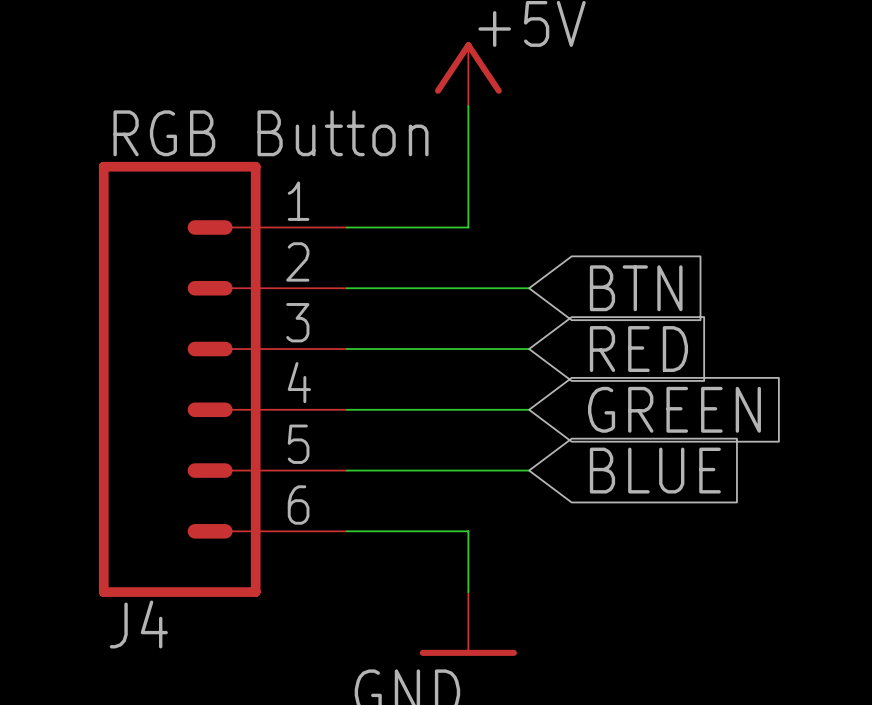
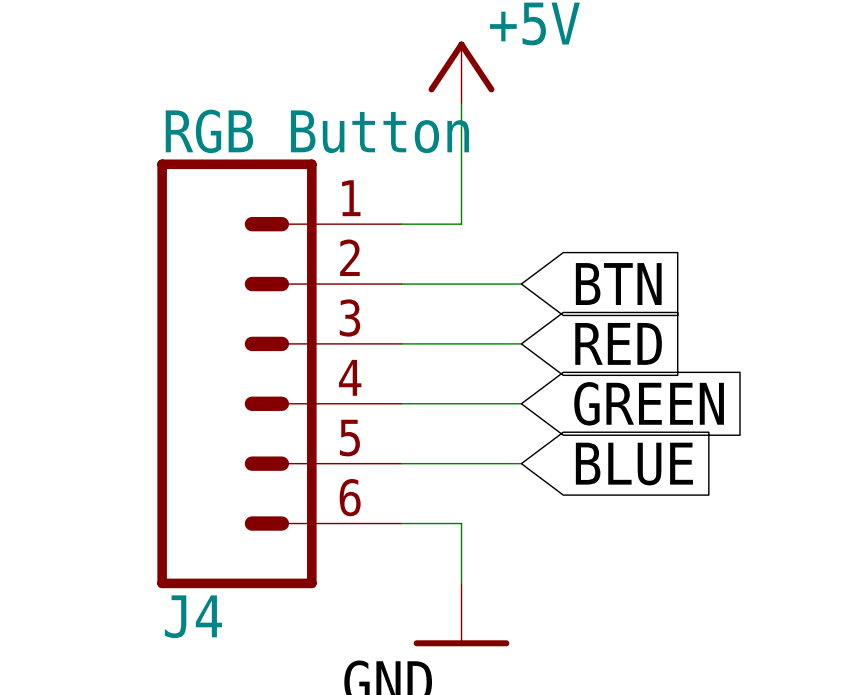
J4 position: (222, 379) -> (279, 373)

